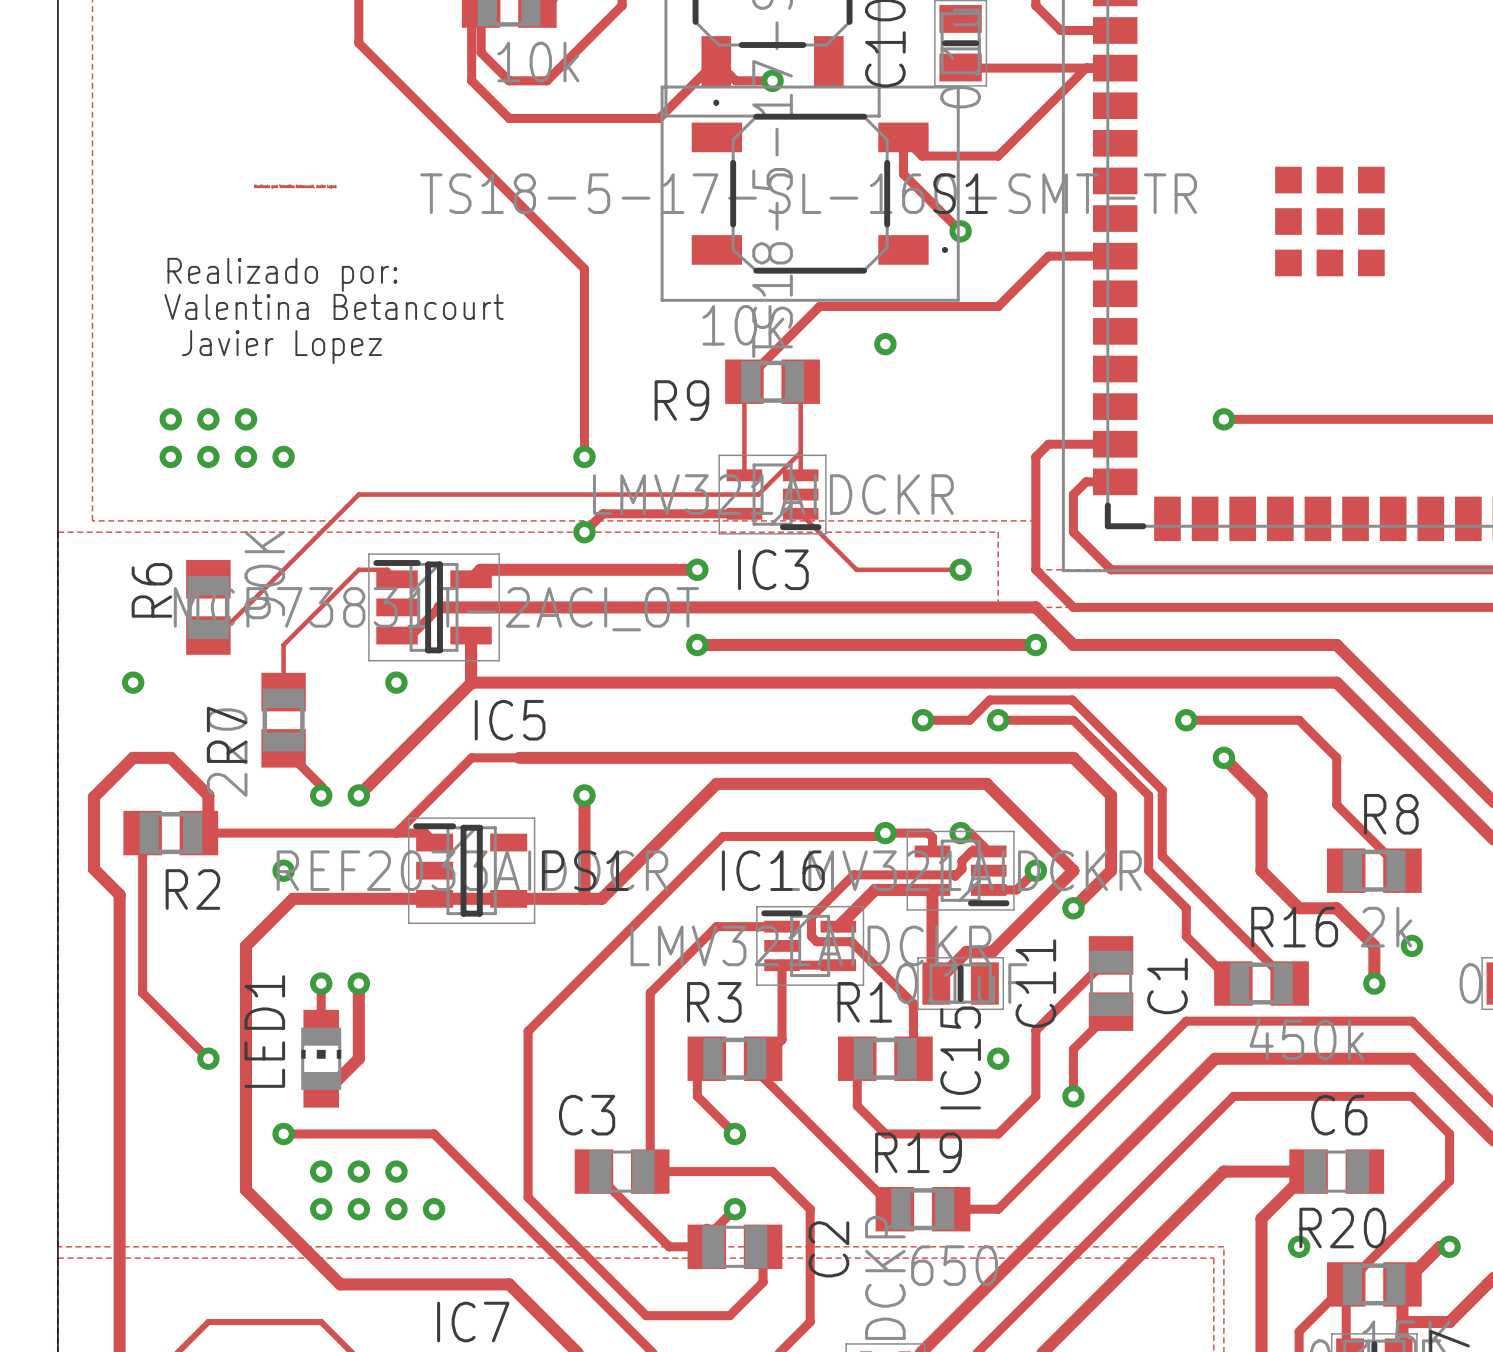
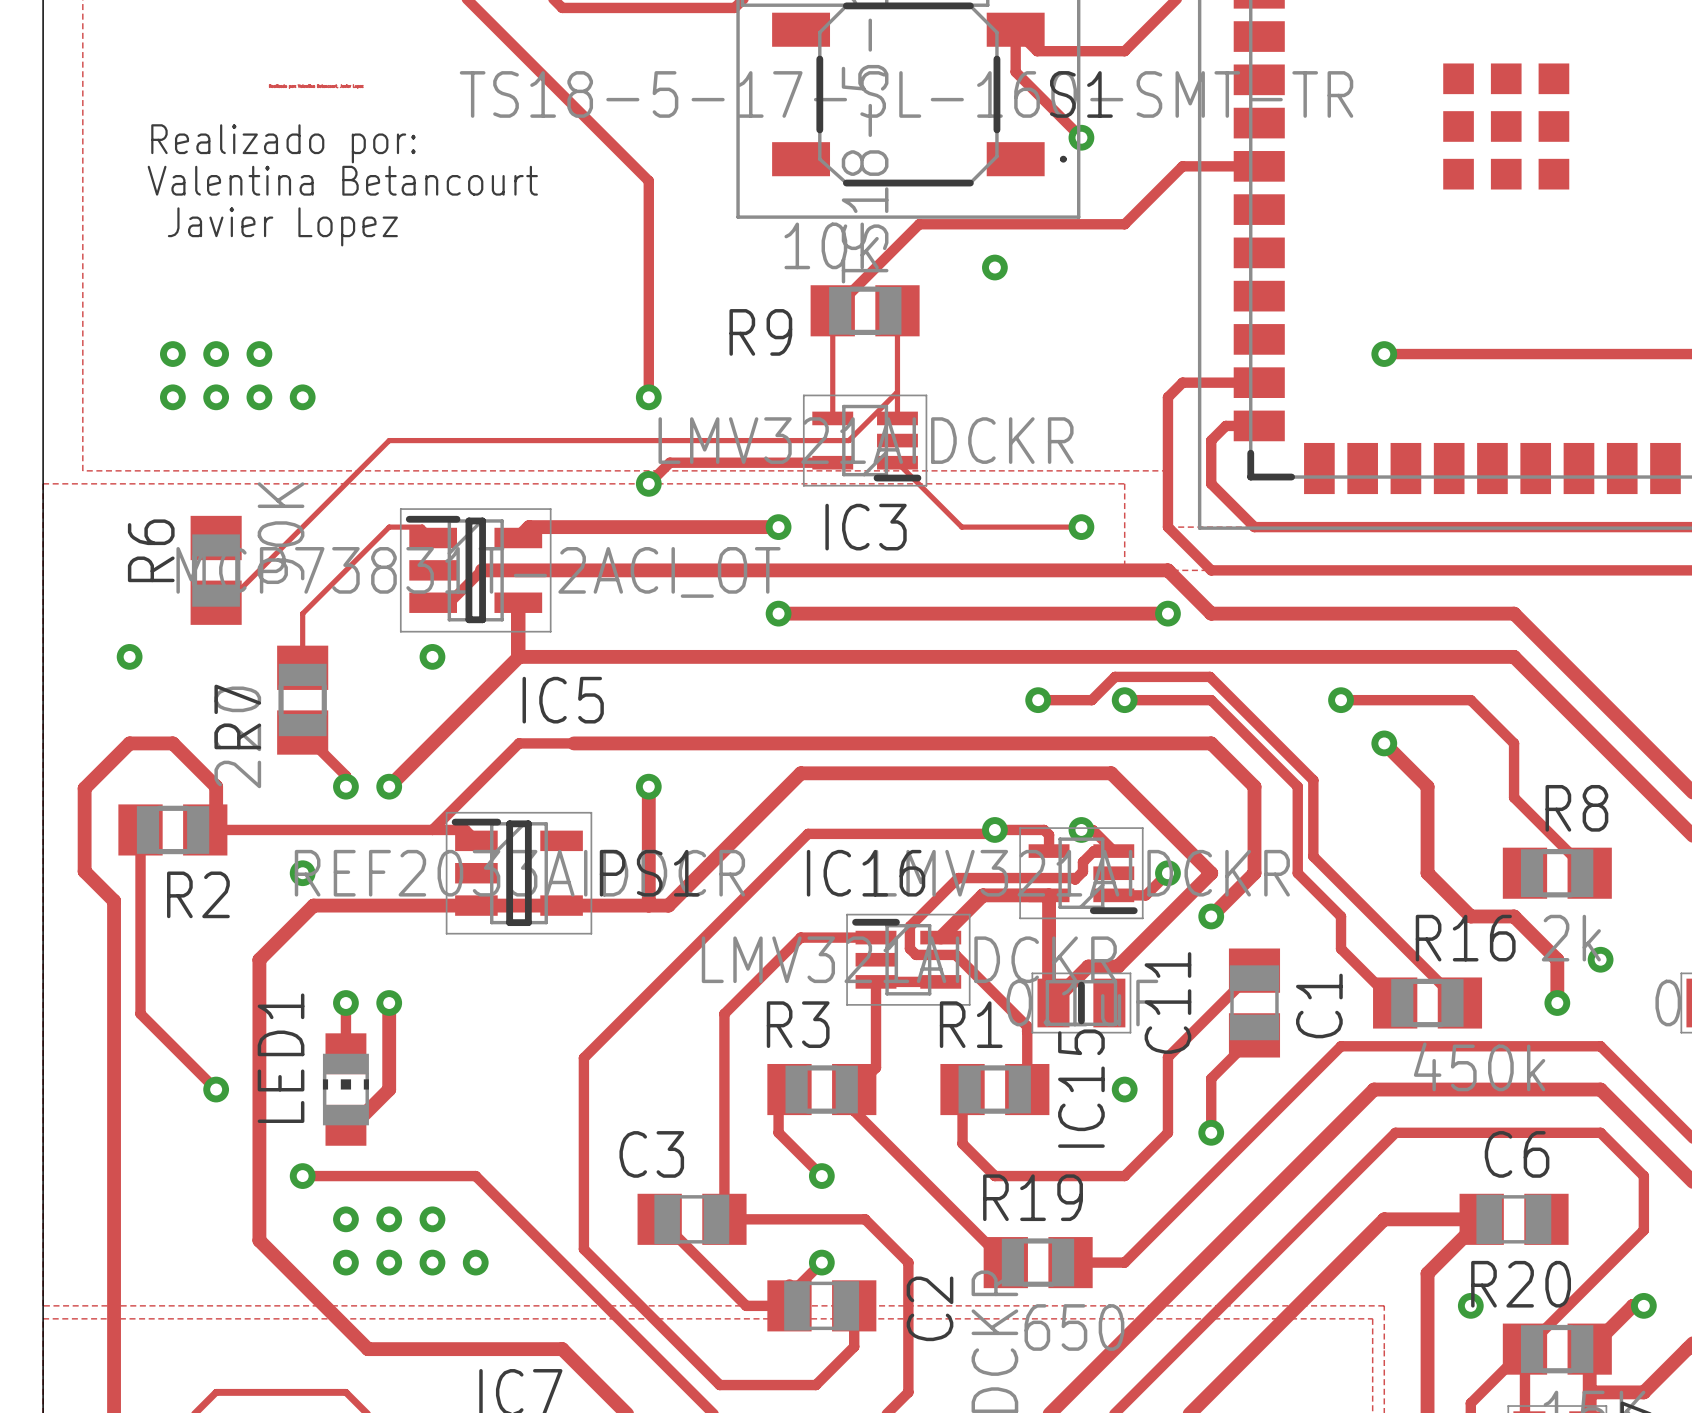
text position: Realizado por: (282, 274) -> Realizado por: (283, 143)
text position: Valentina Betancourt (334, 306) -> Valentina Betancourt (342, 180)
text position: Javier Lopez (281, 347) -> Javier Lopez (282, 226)

